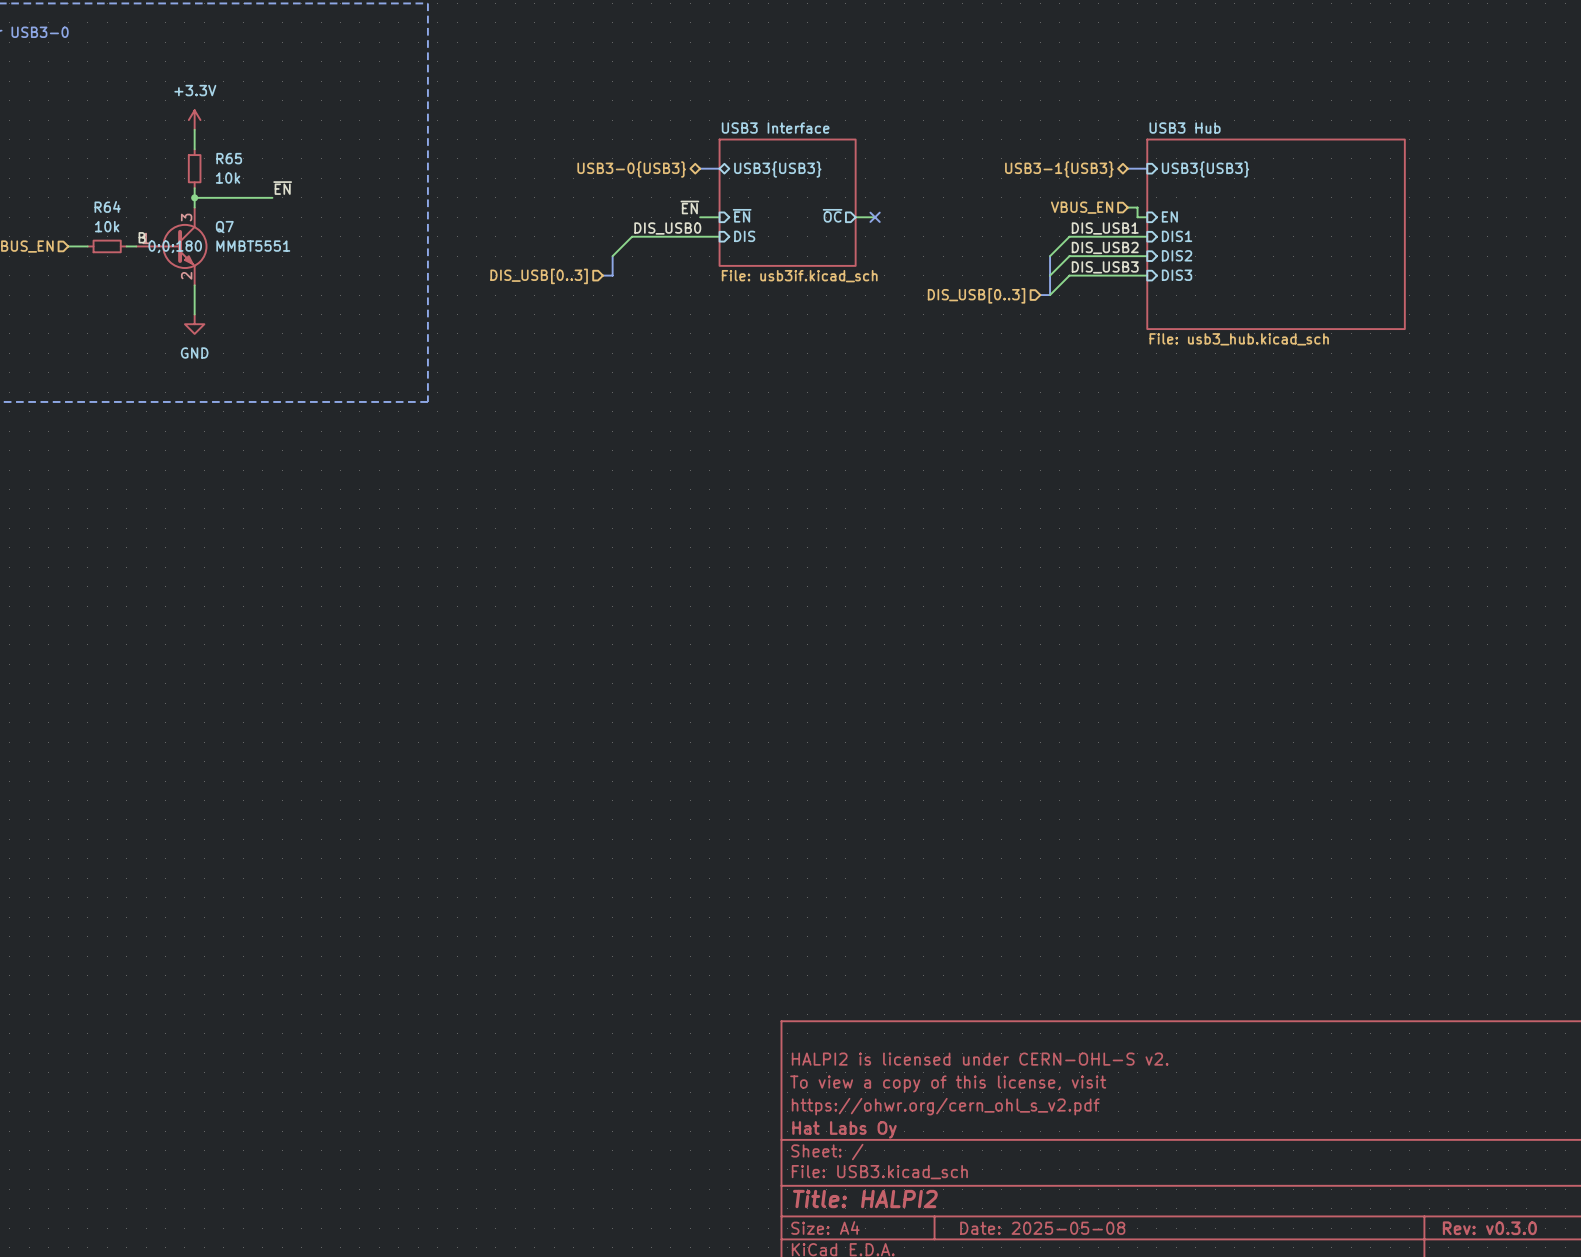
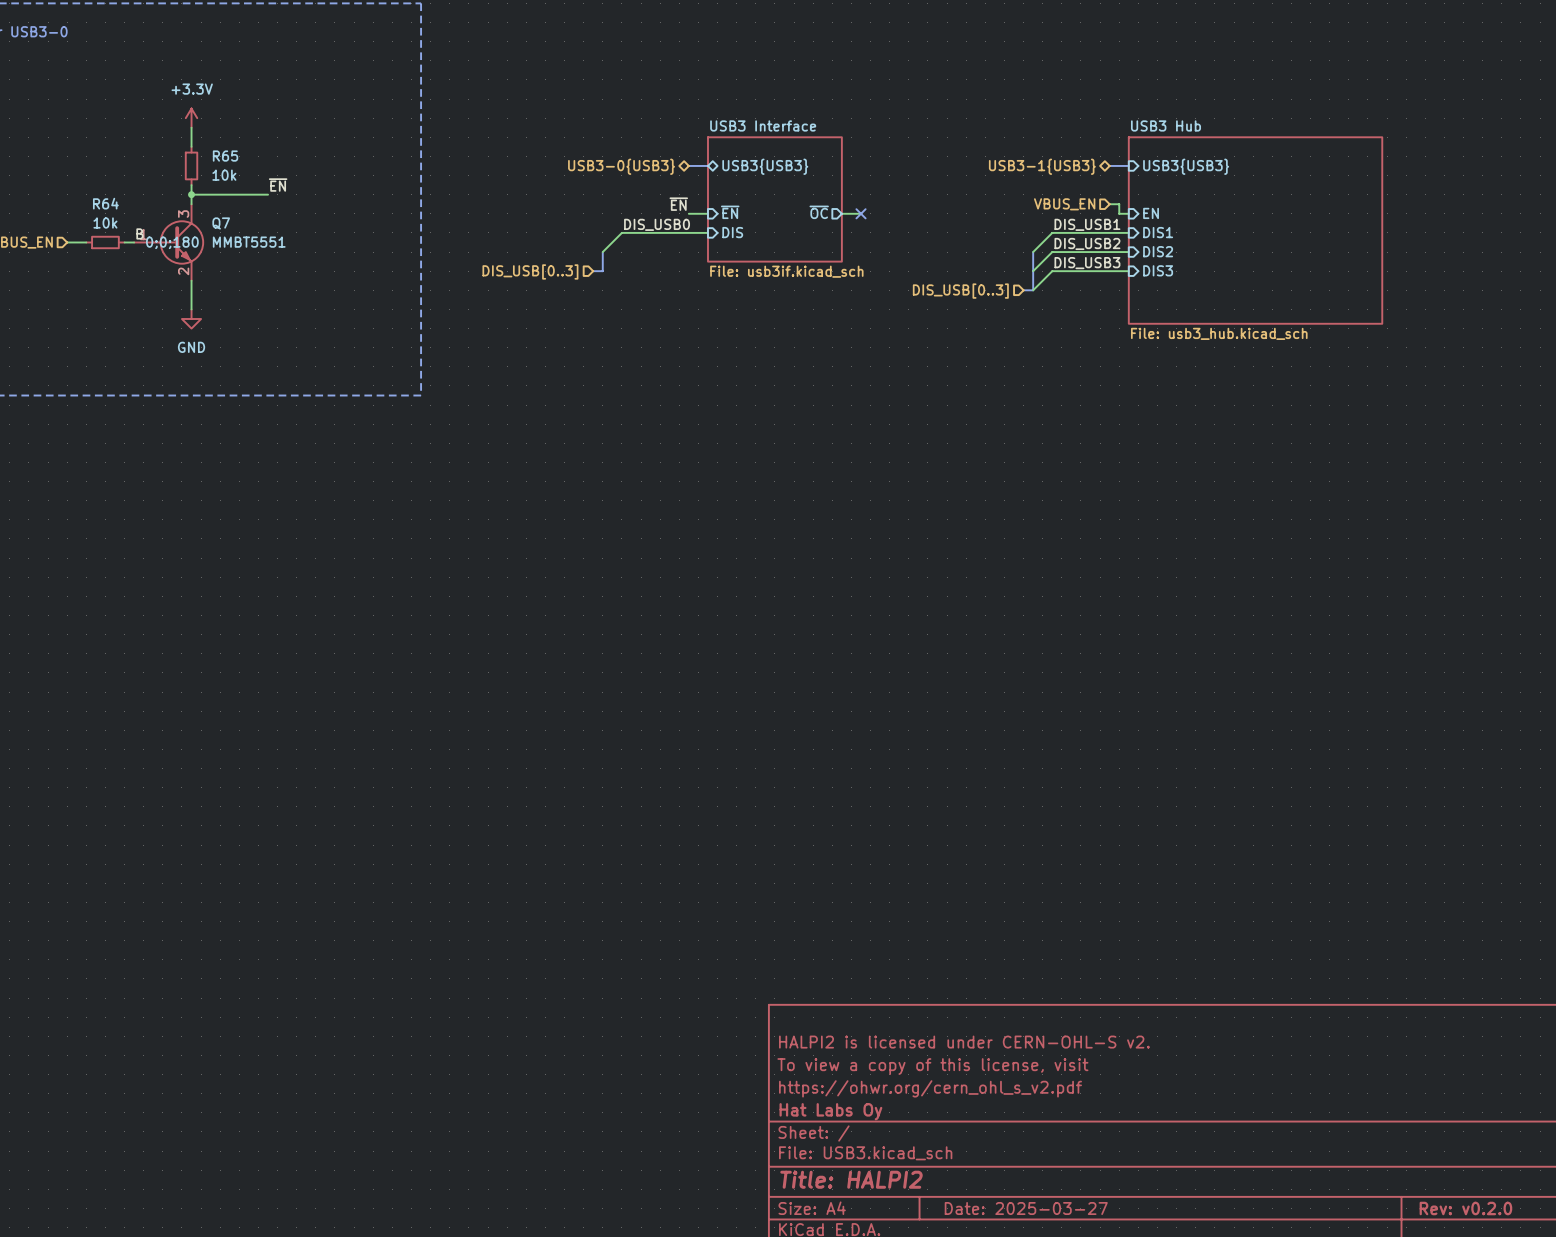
title block: Date: 2025-05-08 (1042, 1228) -> Date: 2025-03-27 (1026, 1208)
title block: Rev: v0.3.0 (1489, 1228) -> Rev: v0.2.0 (1465, 1208)

